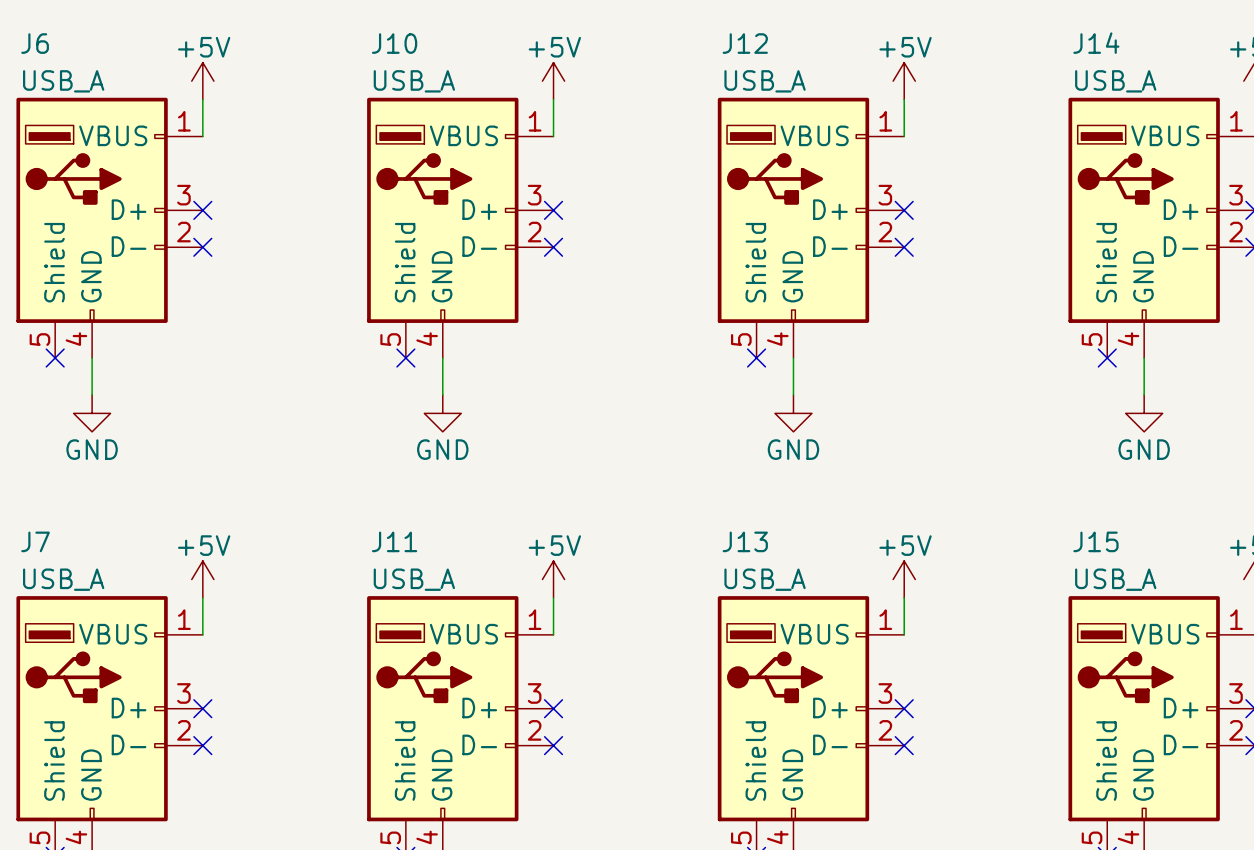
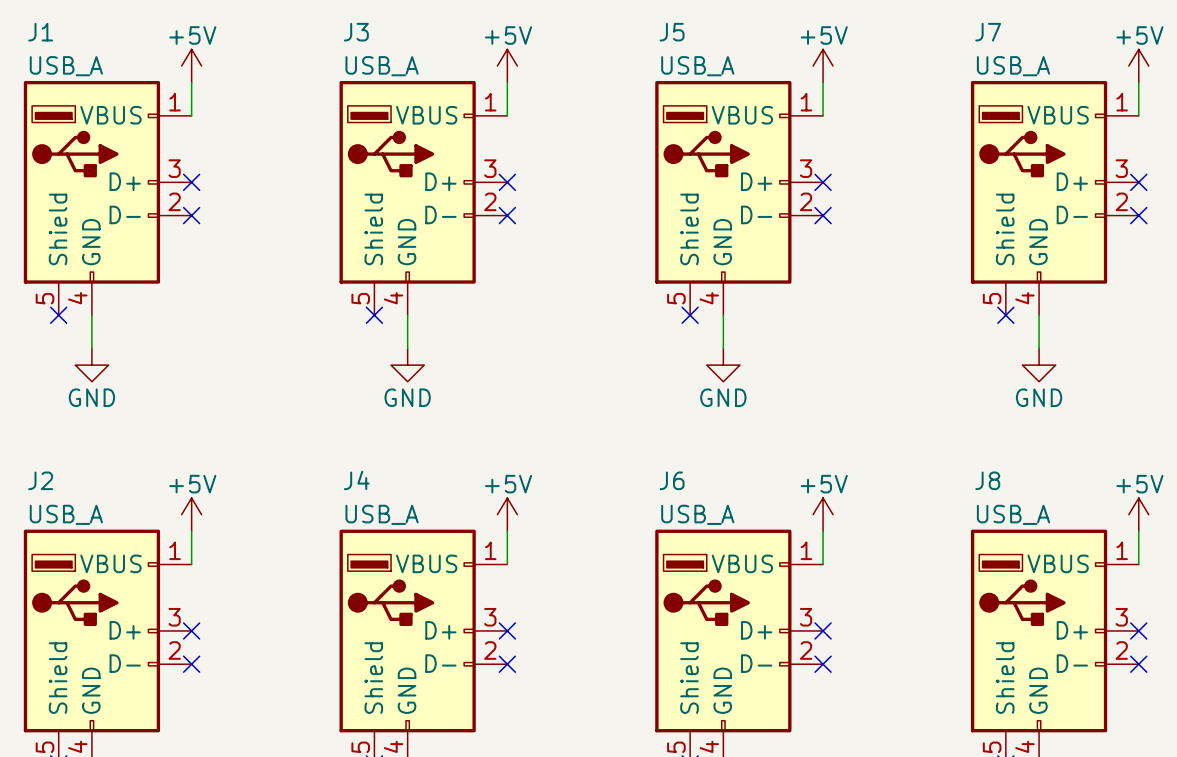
J6 name: J6 (35, 43) -> J1 (40, 32)
J10 name: J10 (394, 43) -> J3 (356, 32)
J12 name: J12 (745, 43) -> J5 (672, 32)
J14 name: J14 (1096, 43) -> J7 (988, 32)
J7 name: J7 (35, 541) -> J2 (40, 480)
J11 name: J11 (394, 541) -> J4 (356, 480)
J13 name: J13 (745, 541) -> J6 (672, 480)
J15 name: J15 (1095, 541) -> J8 (987, 480)

